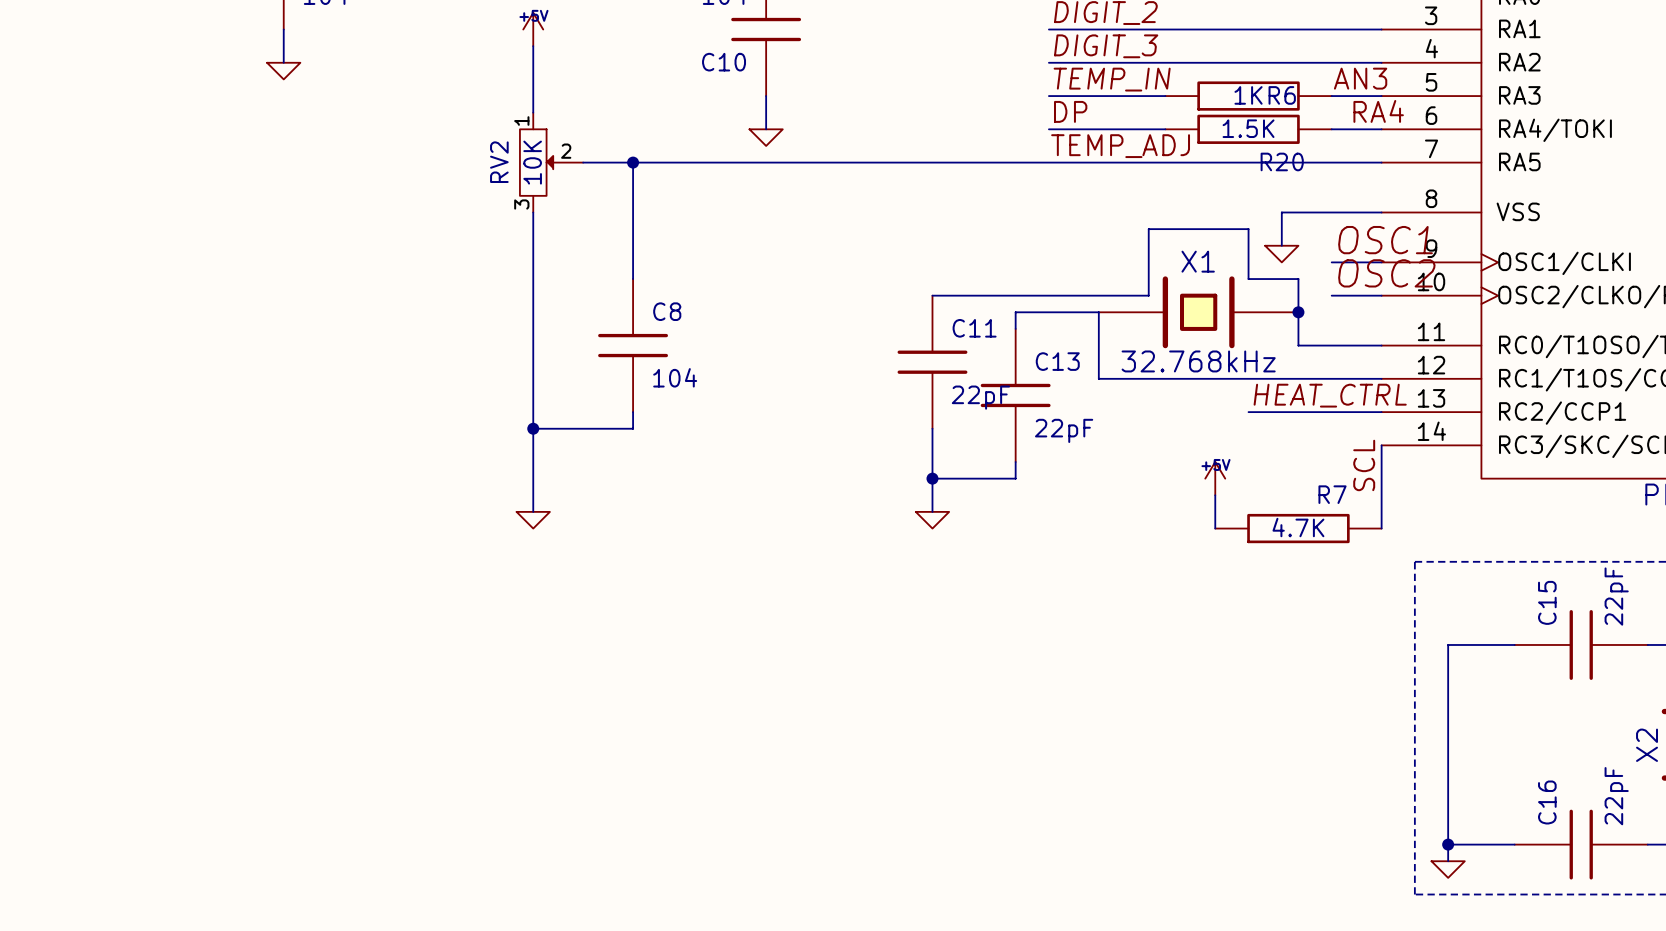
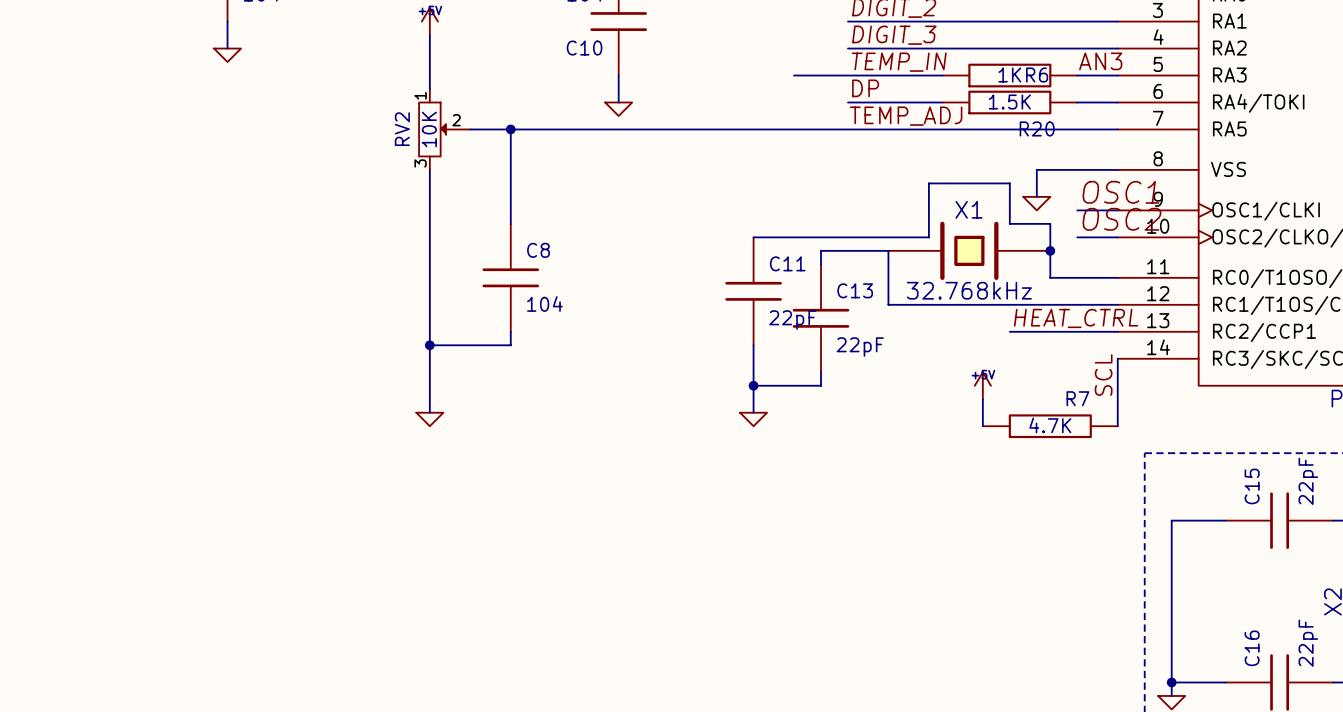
wire: none -> (794, 75) (847, 75)
label: RA4 (1378, 111) -> none

